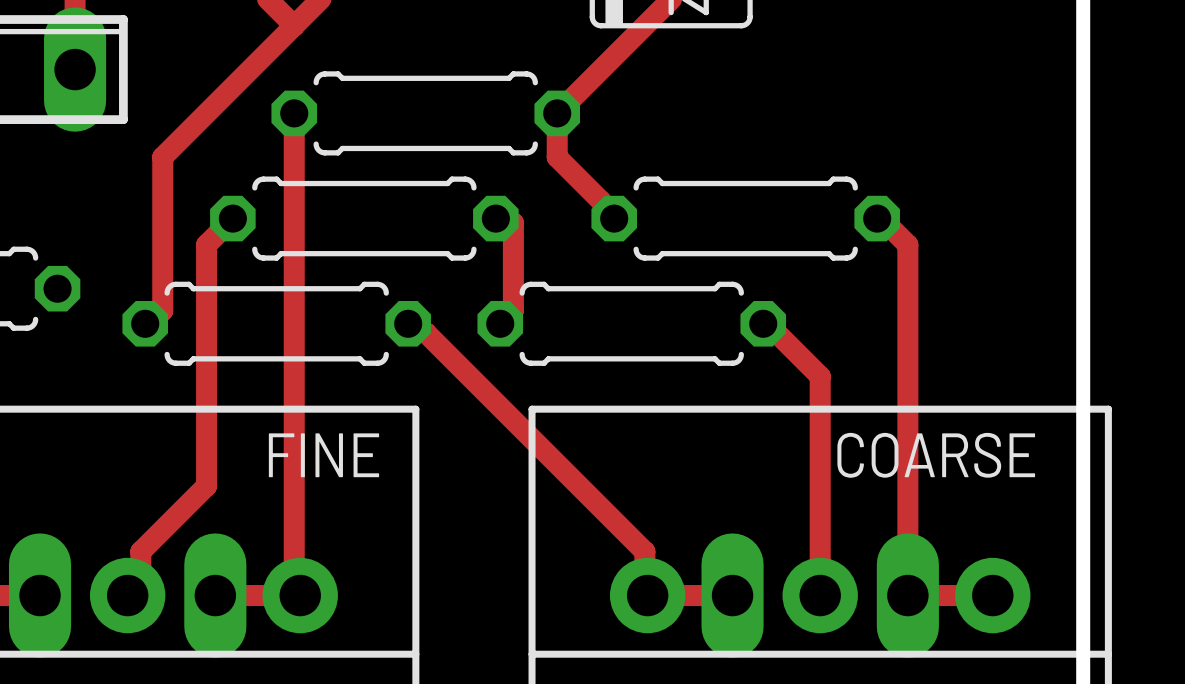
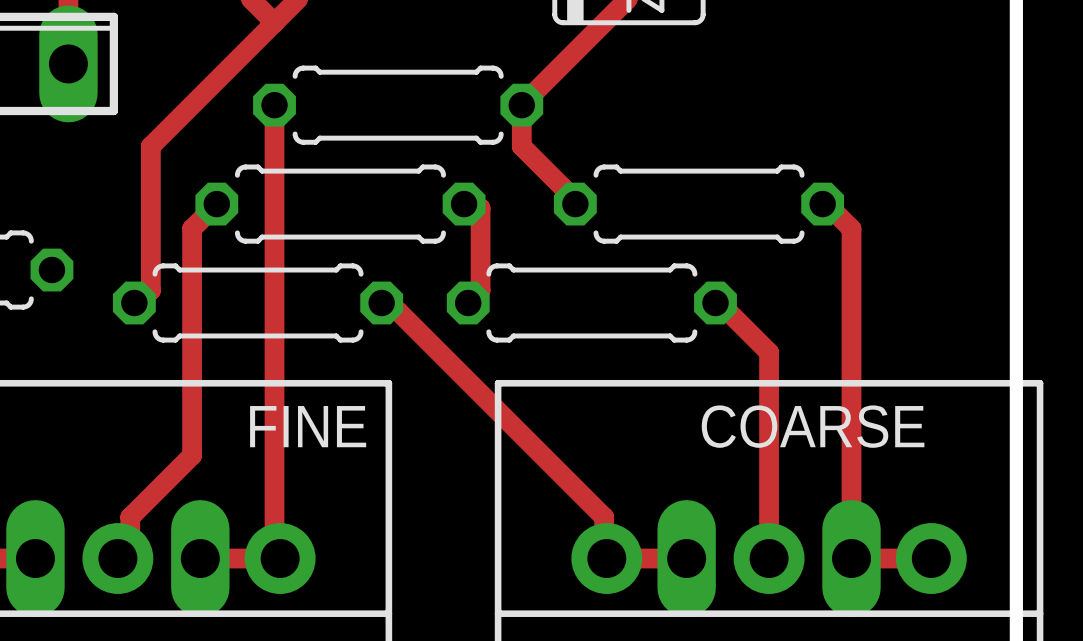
COARSE name position: COARSE (936, 455) -> COARSE (813, 426)

